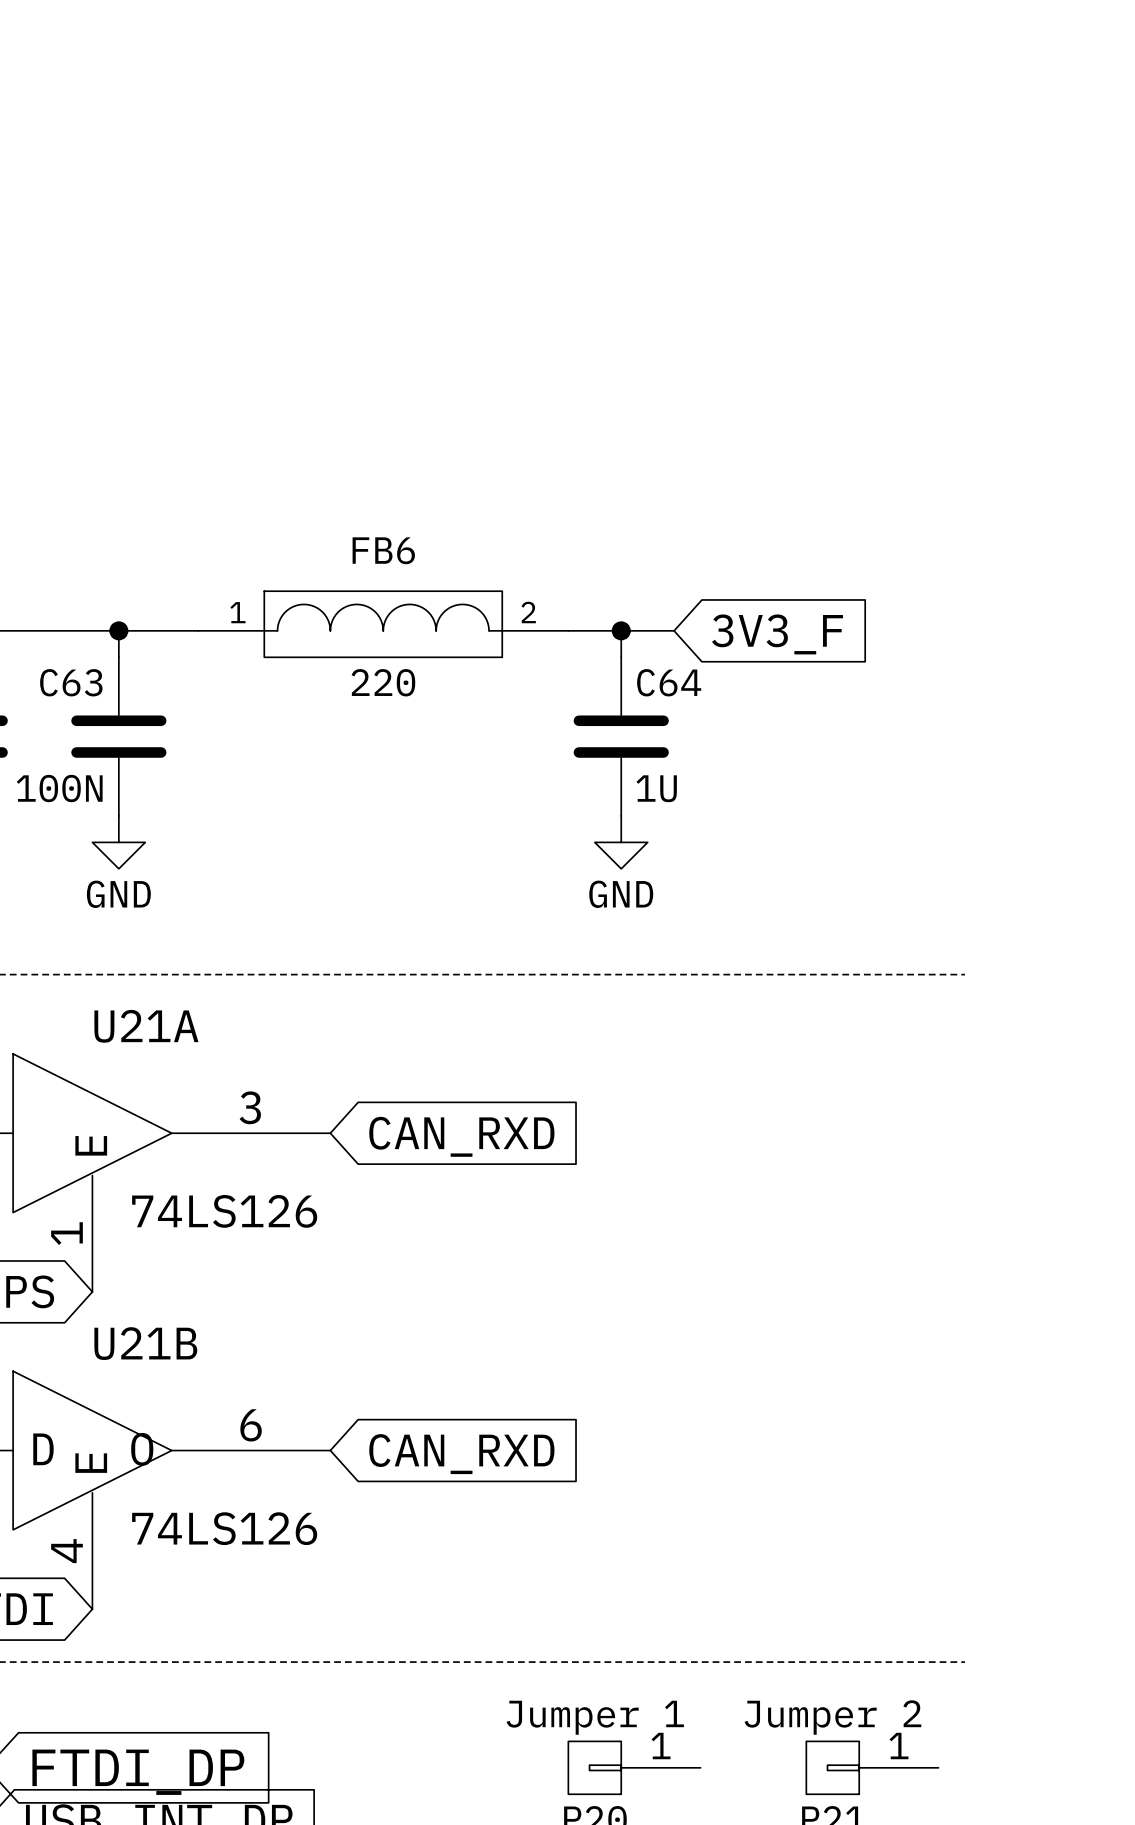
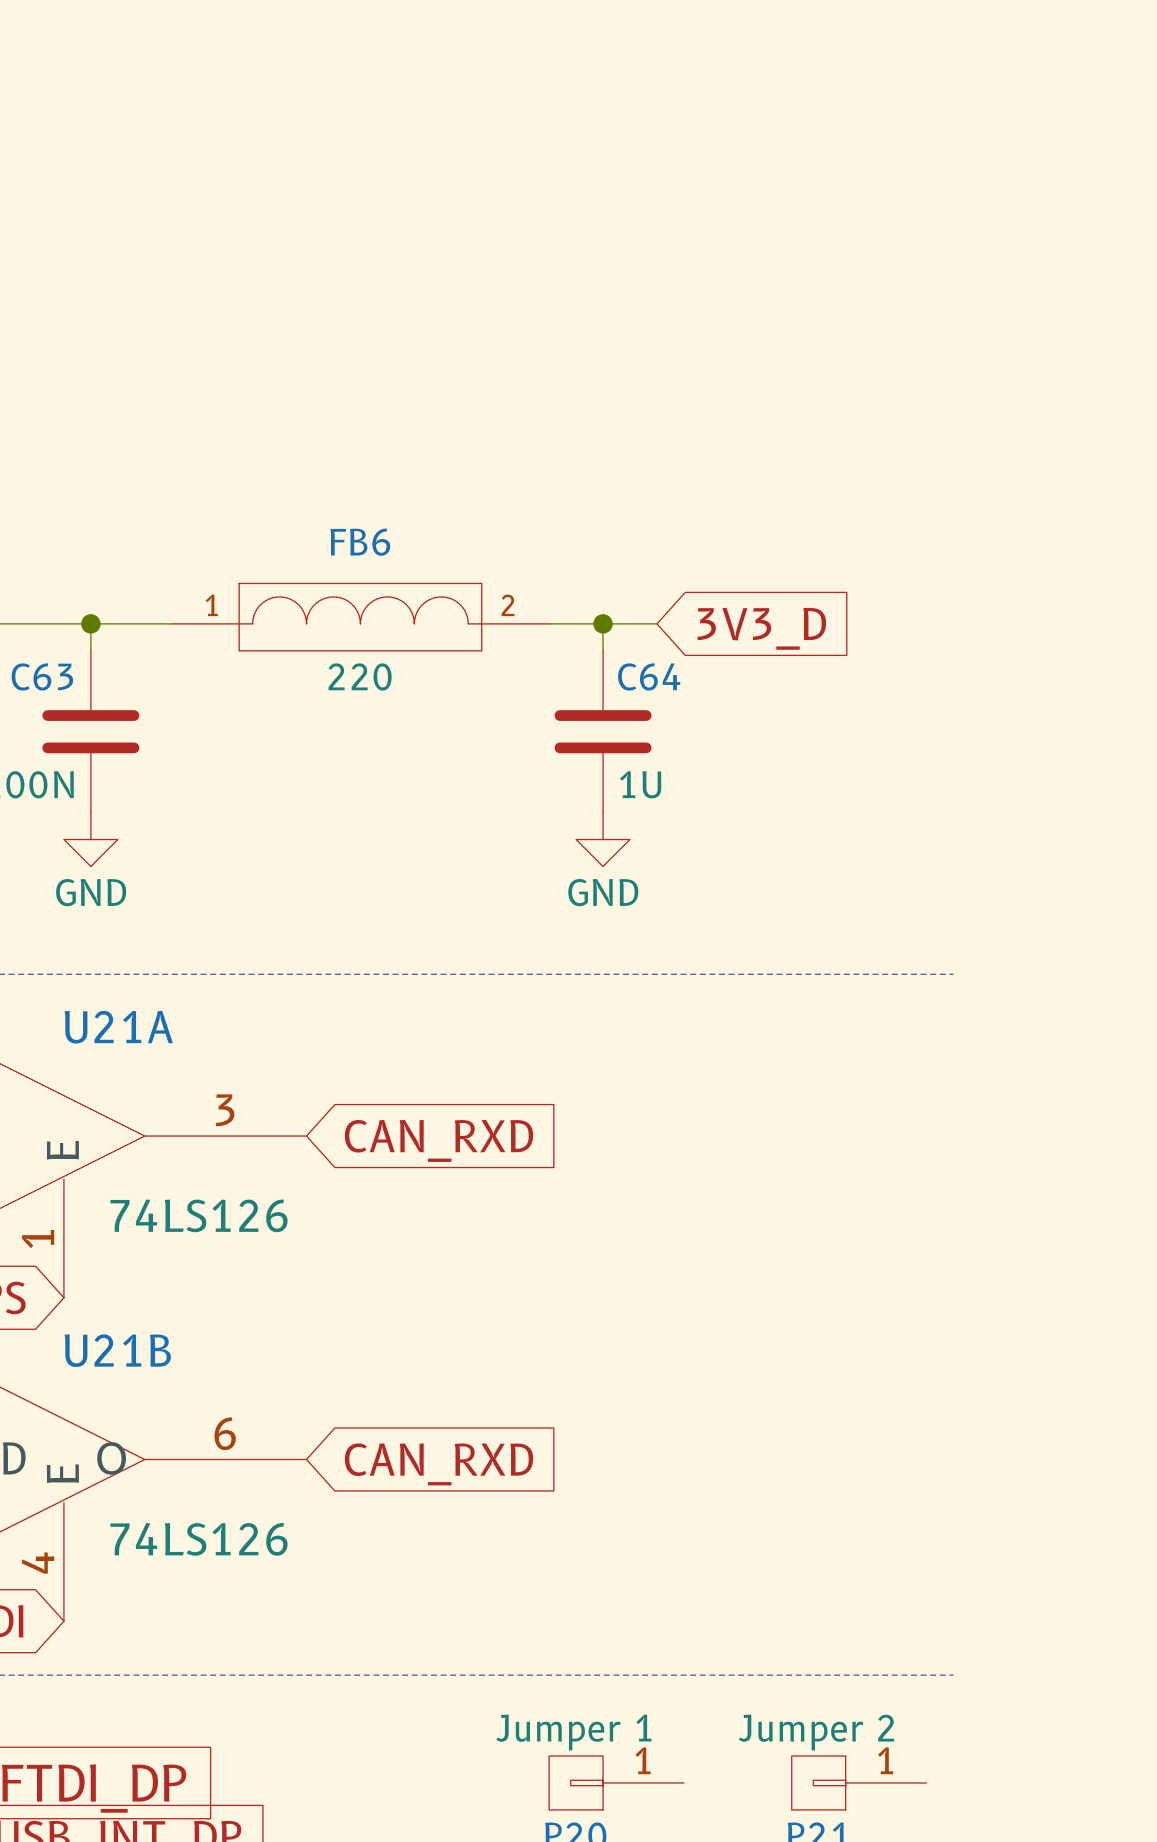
global label: 3V3_F (777, 634) -> 3V3_D (761, 628)

